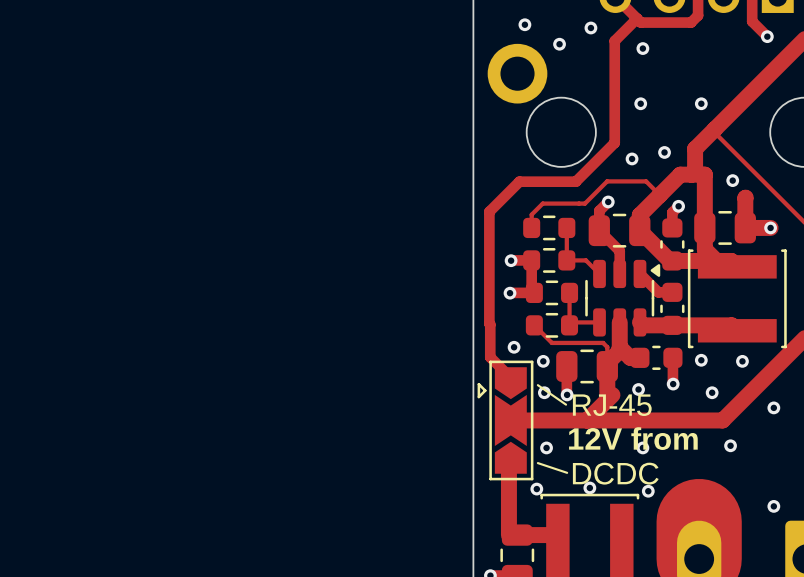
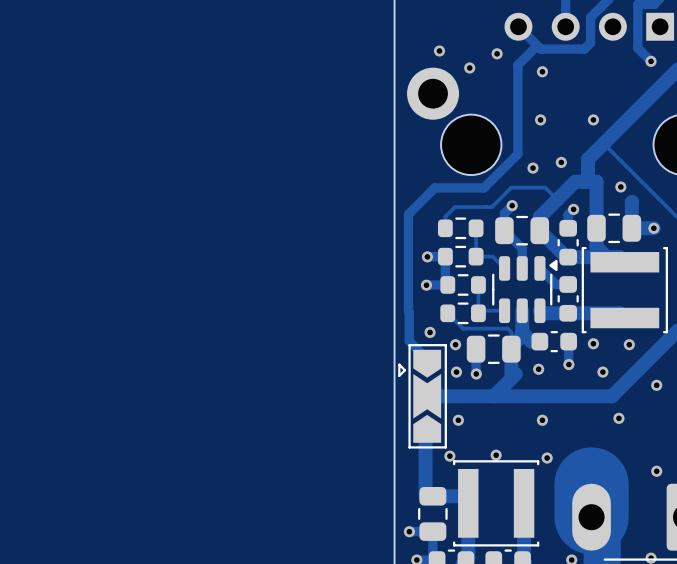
line: (537, 385) (566, 404) -> none
text: RJ-45 (612, 405) -> none
text: 12V from (633, 438) -> none
line: (537, 463) (567, 472) -> none
text: DCDC (615, 473) -> none

